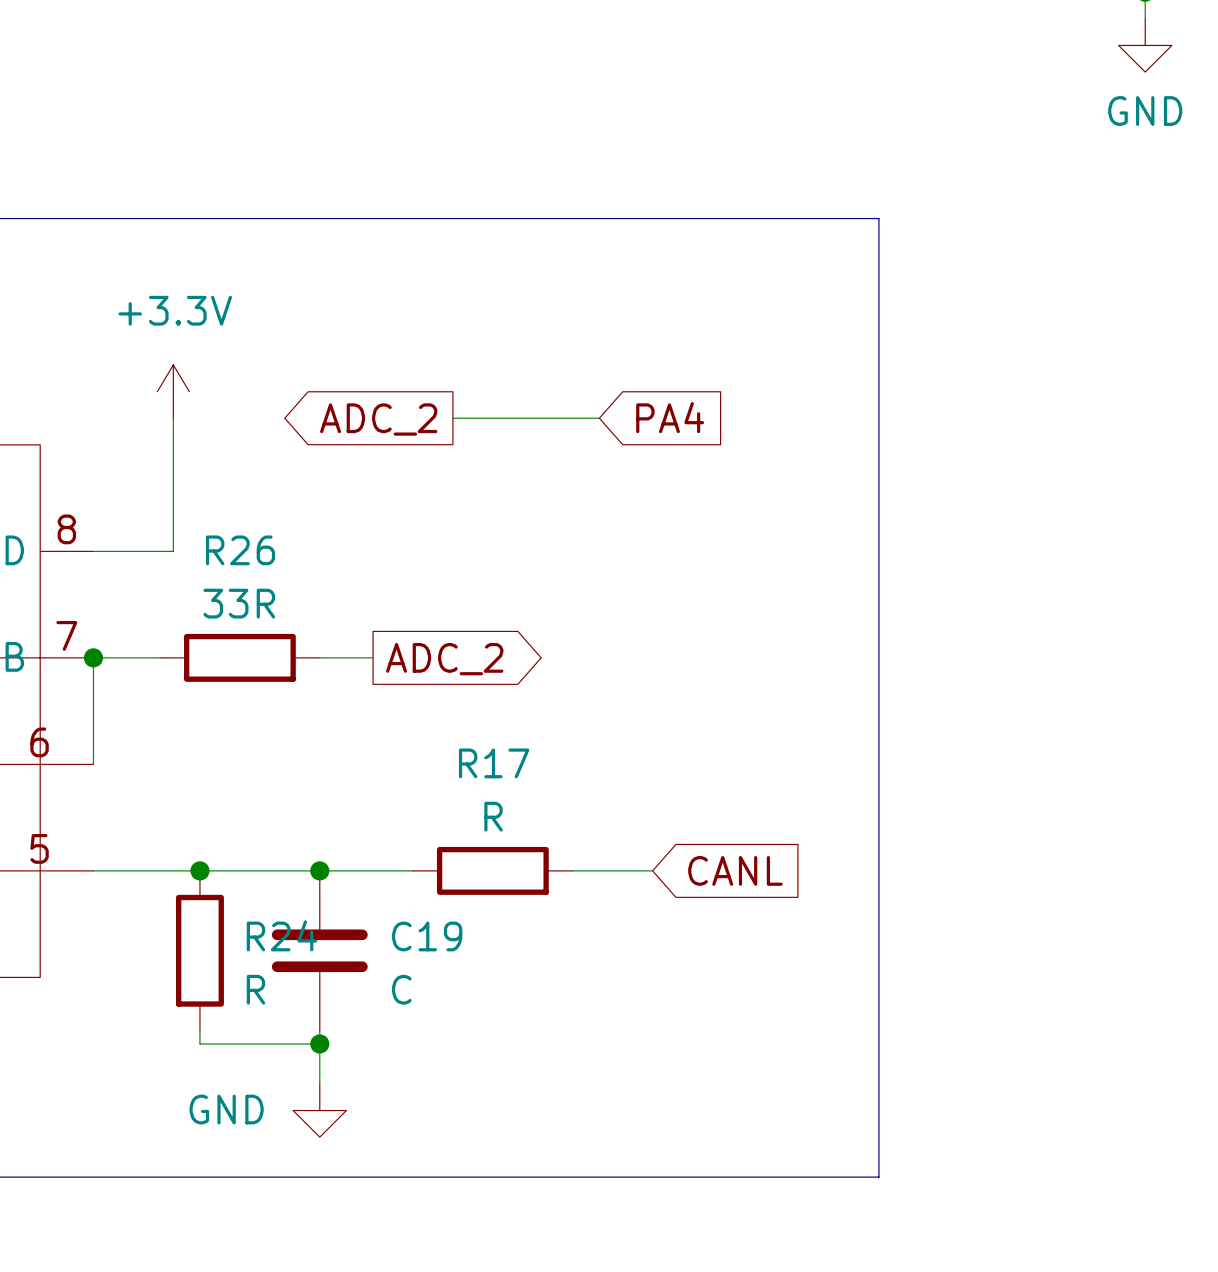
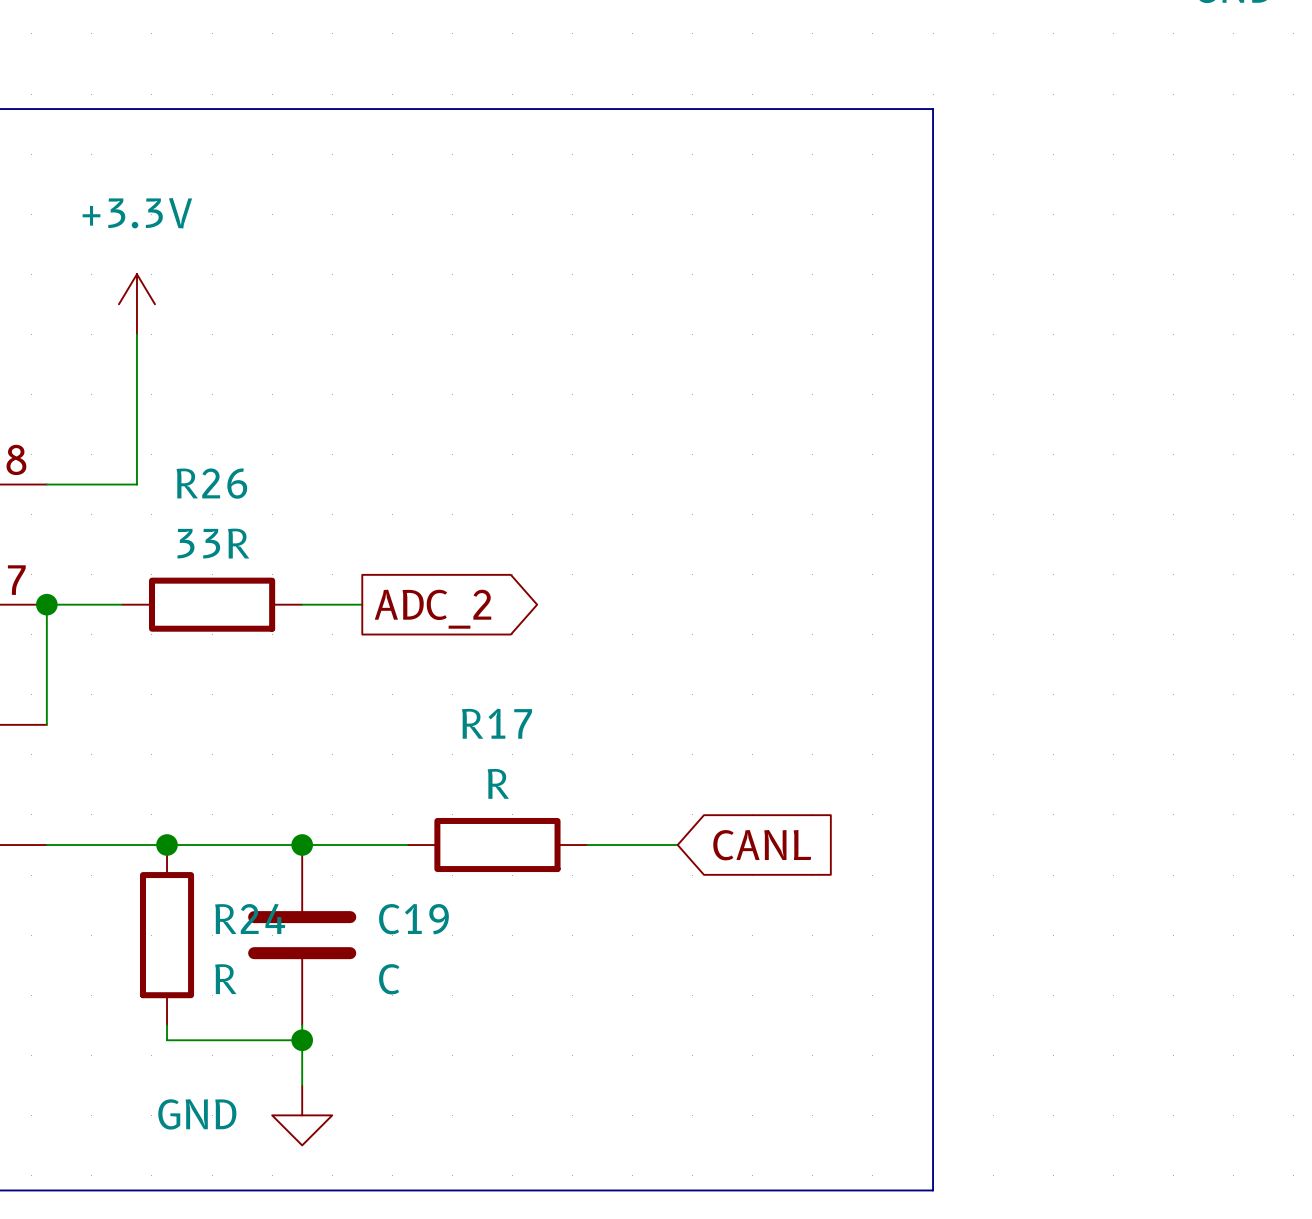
global label: PA4 (670, 417) -> none
wire: (452, 418) (599, 418) -> none
global label: ADC_2 (378, 419) -> none

